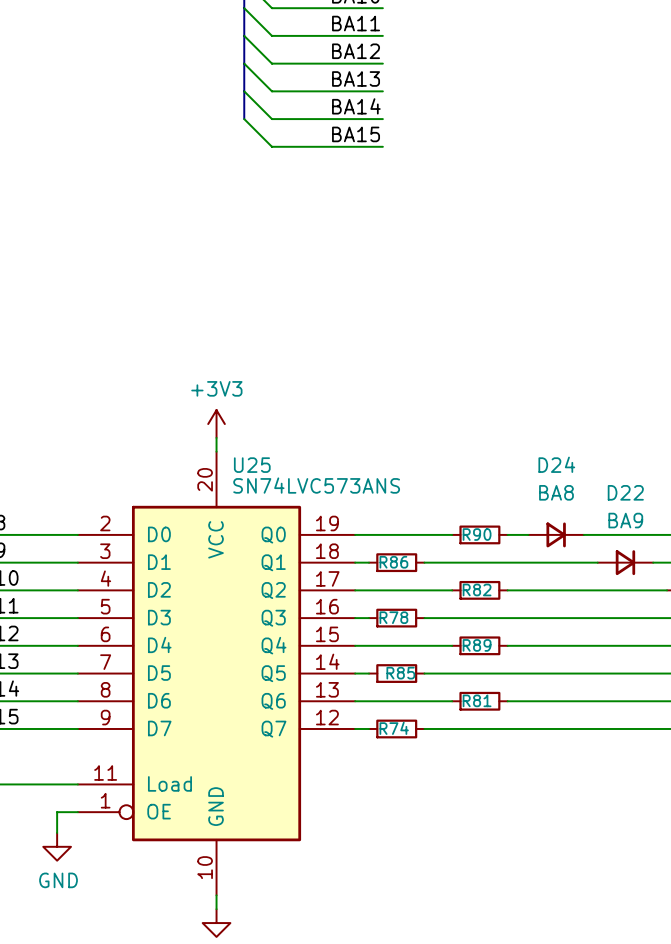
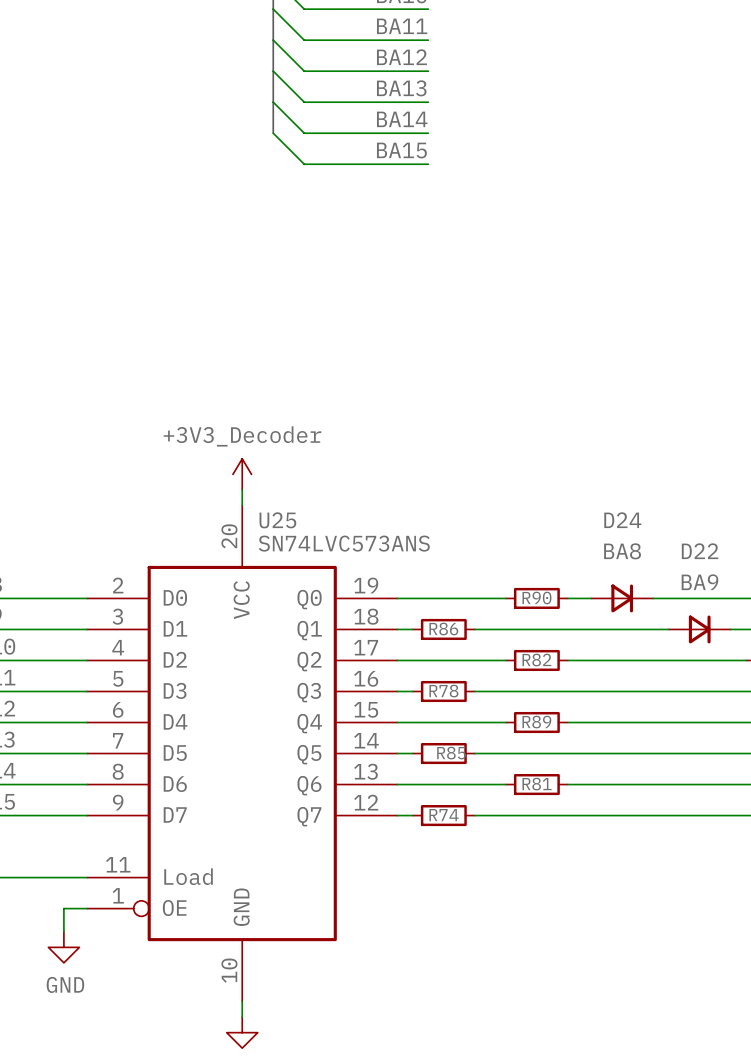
power symbol: +3V3 (216, 424) -> +3V3_Decoder (242, 474)

